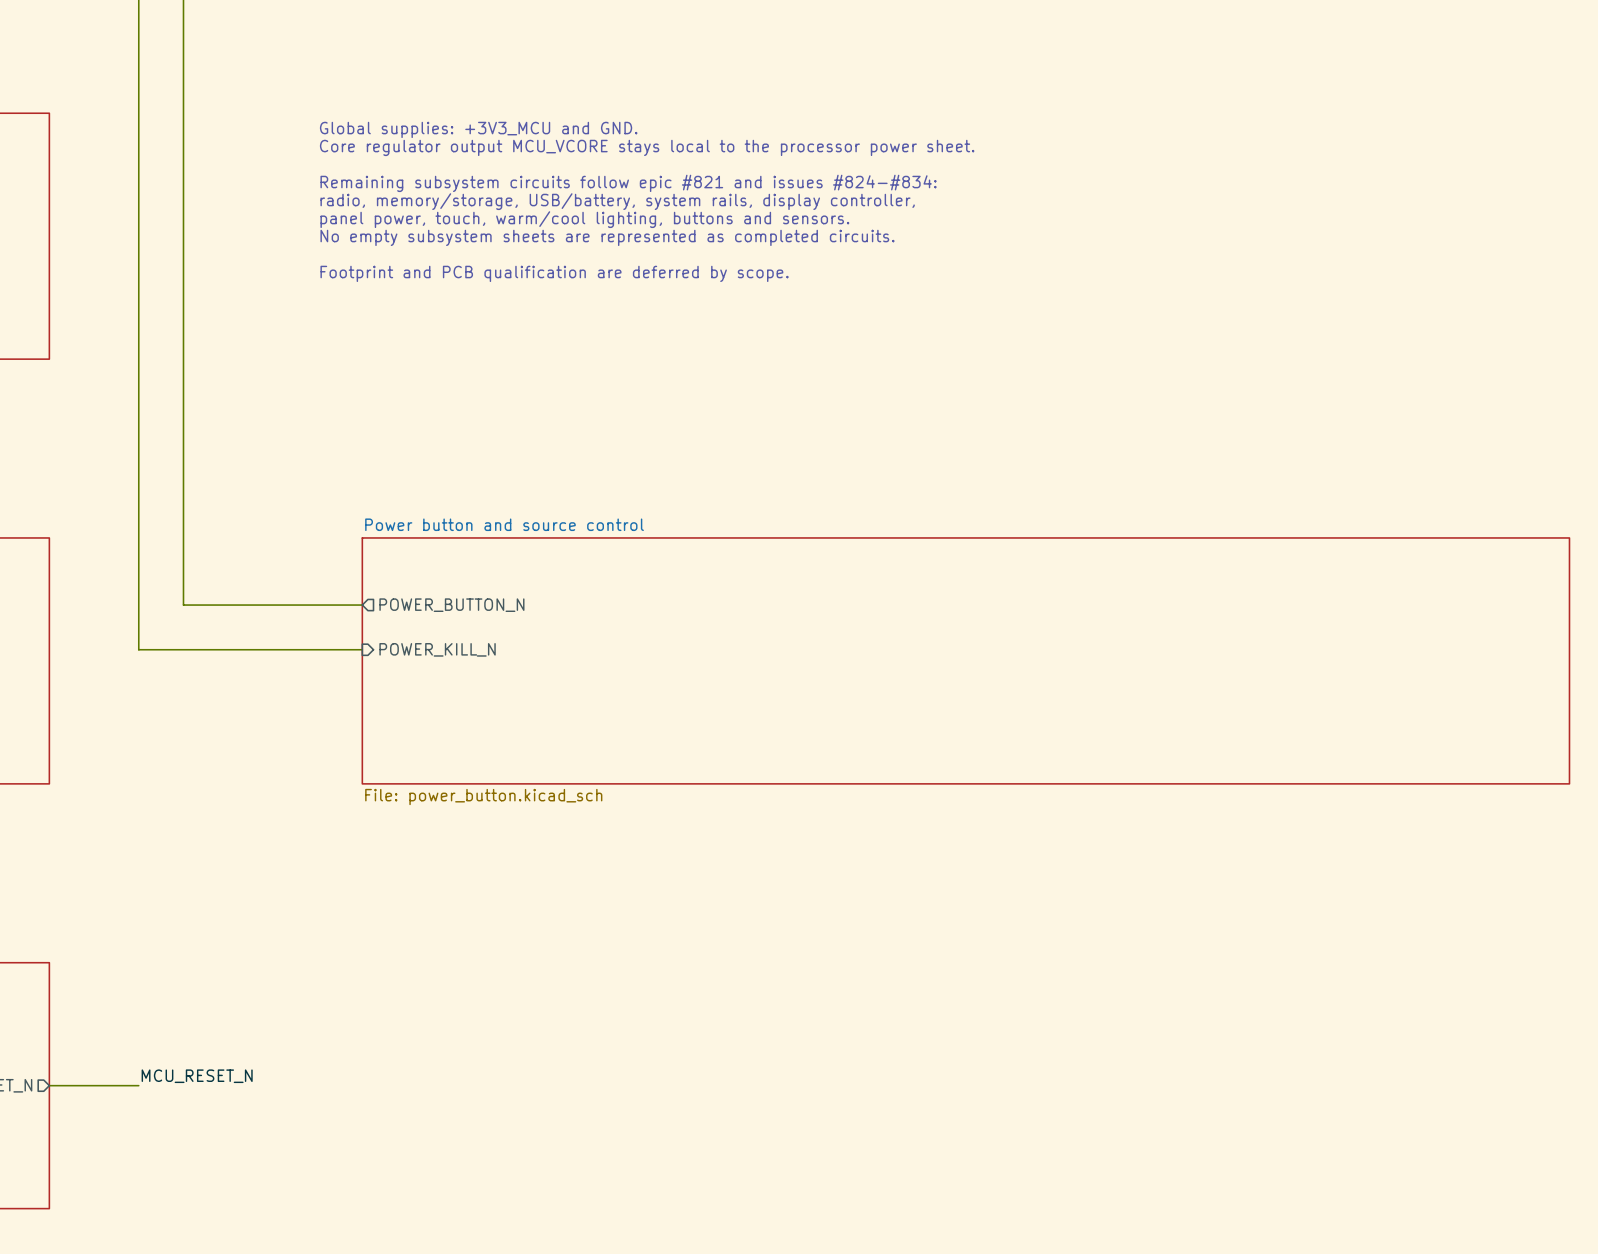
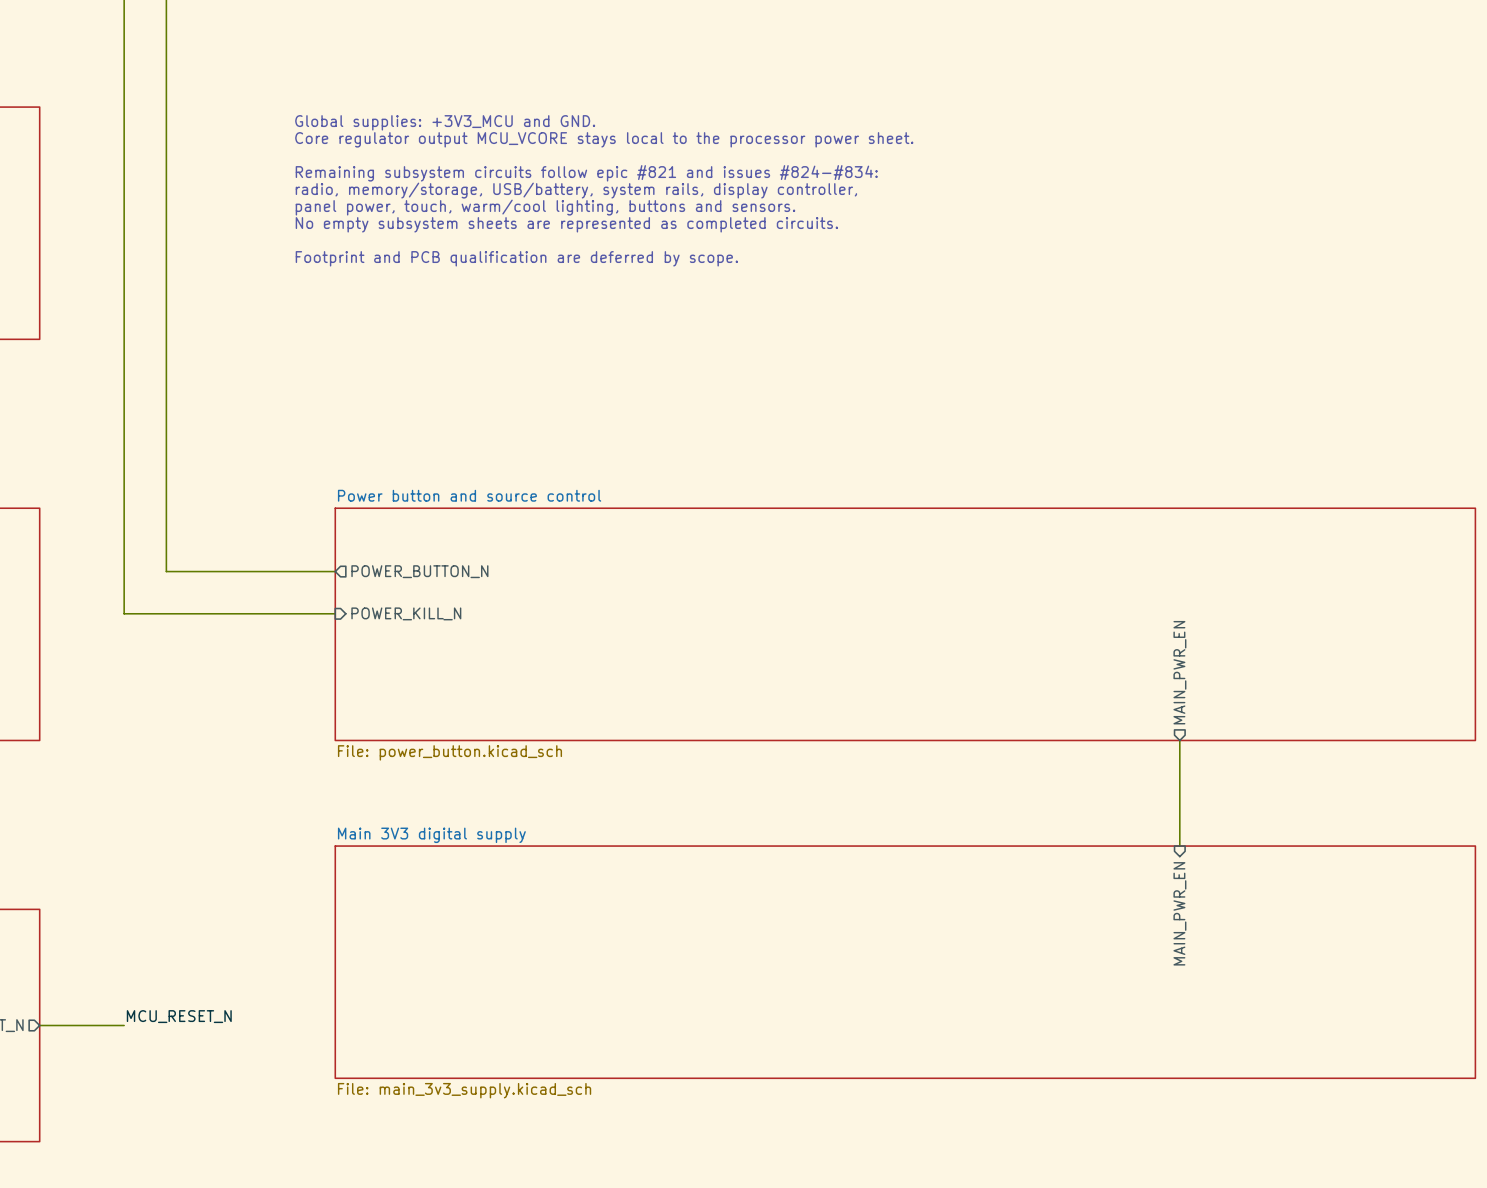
sheet pin: none -> MAIN_PWR_EN (1179, 672)
wire: none -> (1179, 740) (1179, 846)
sheet pin: none -> MAIN_PWR_EN (1179, 913)
sheet Main 3V3 digital supply: none -> File: main_3v3_supply.kicad_sch (905, 962)

